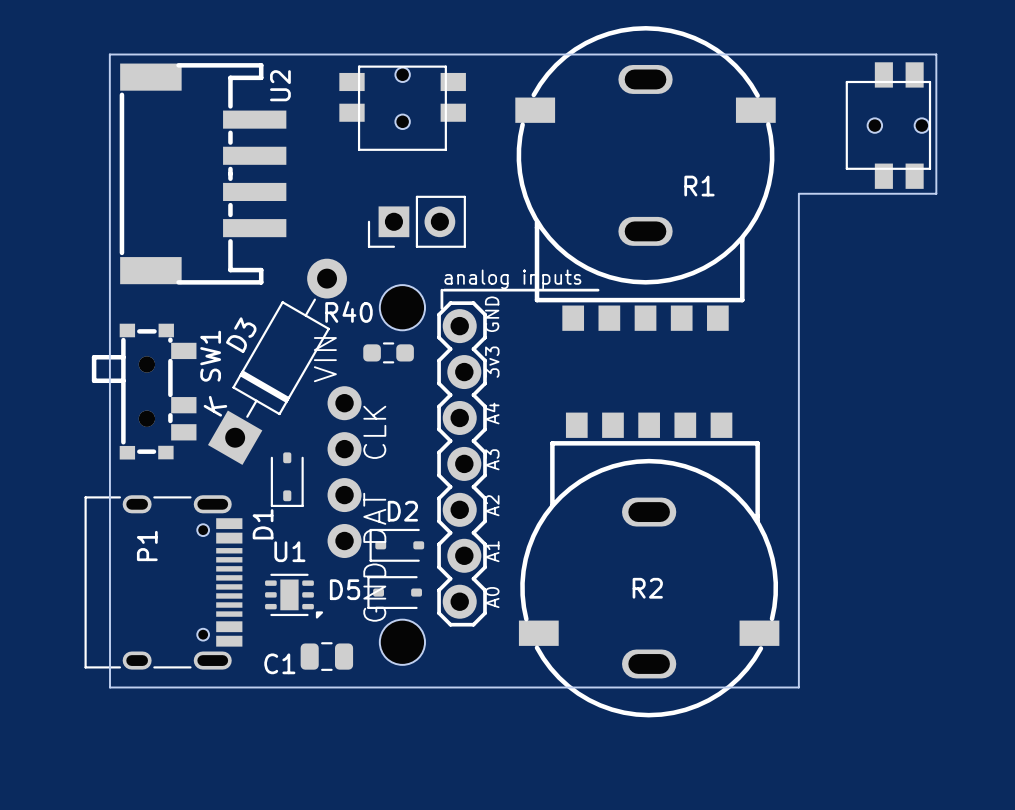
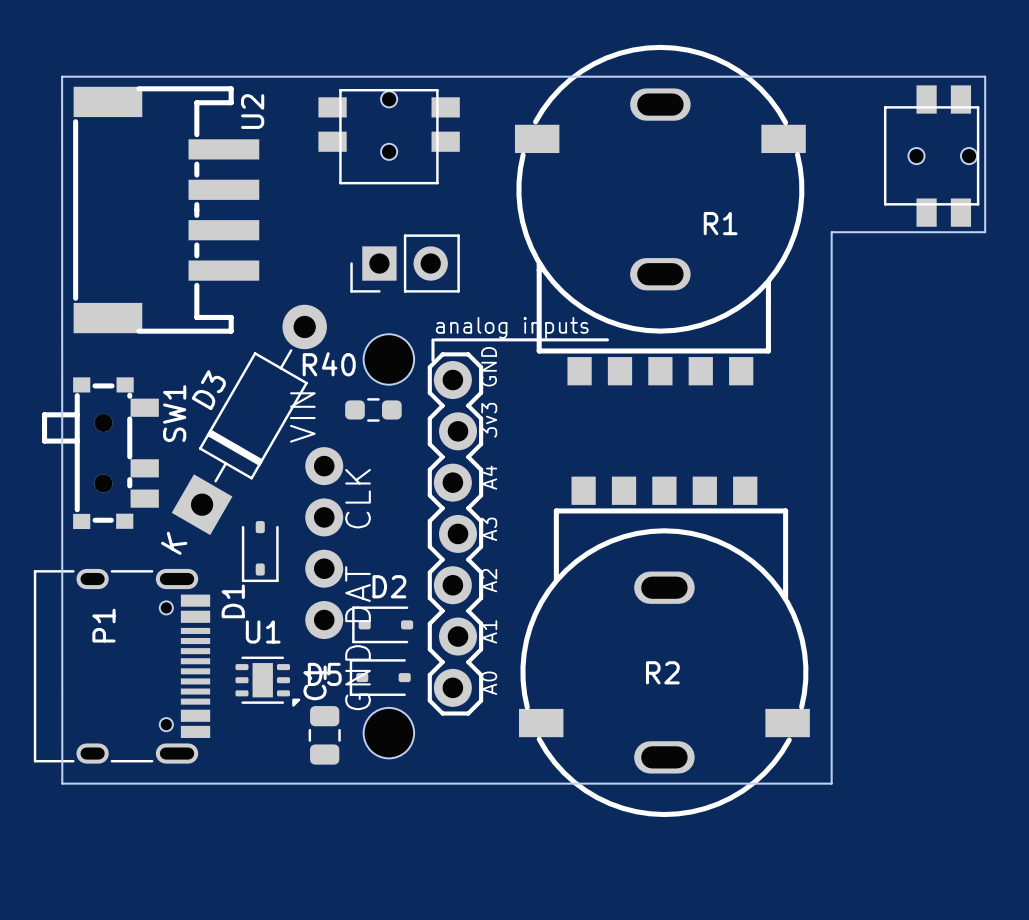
D3 text position: K (215, 406) -> K (174, 543)
C1 rotation: 0° (326, 656) -> 90° clockwise (324, 735)

